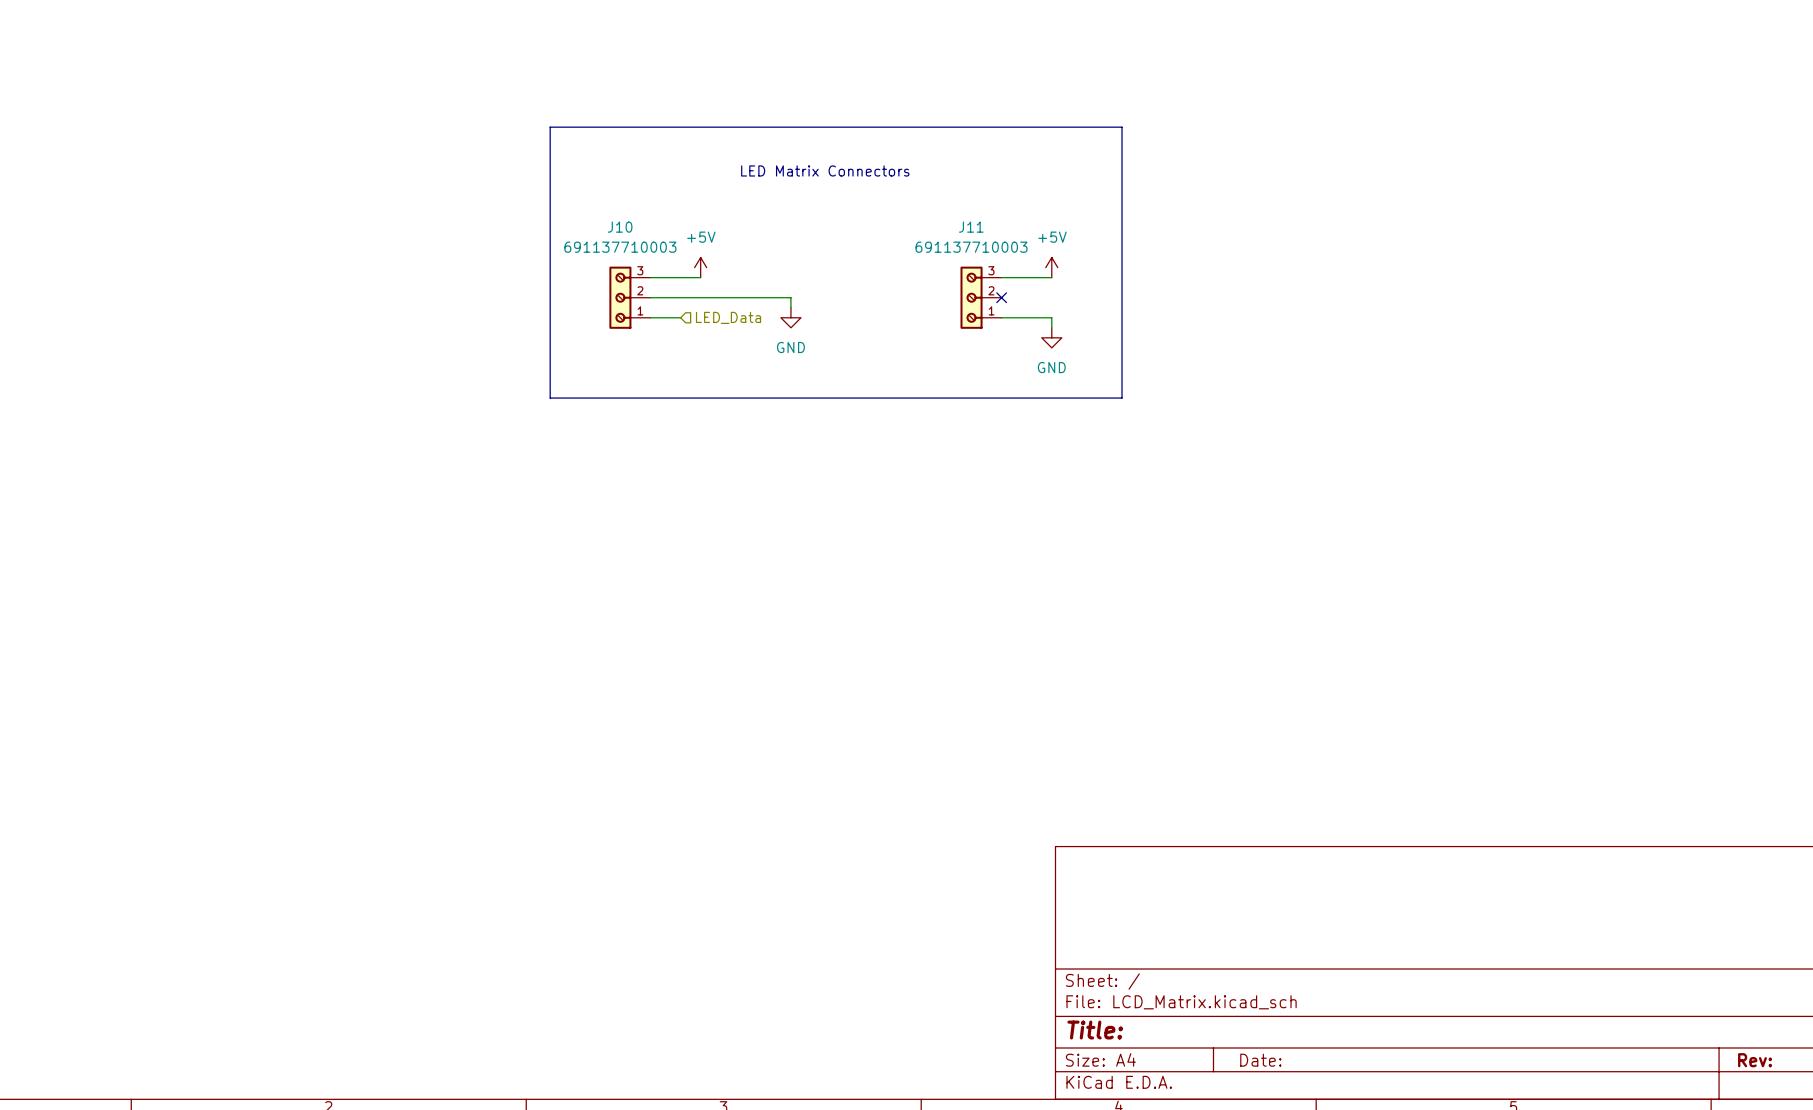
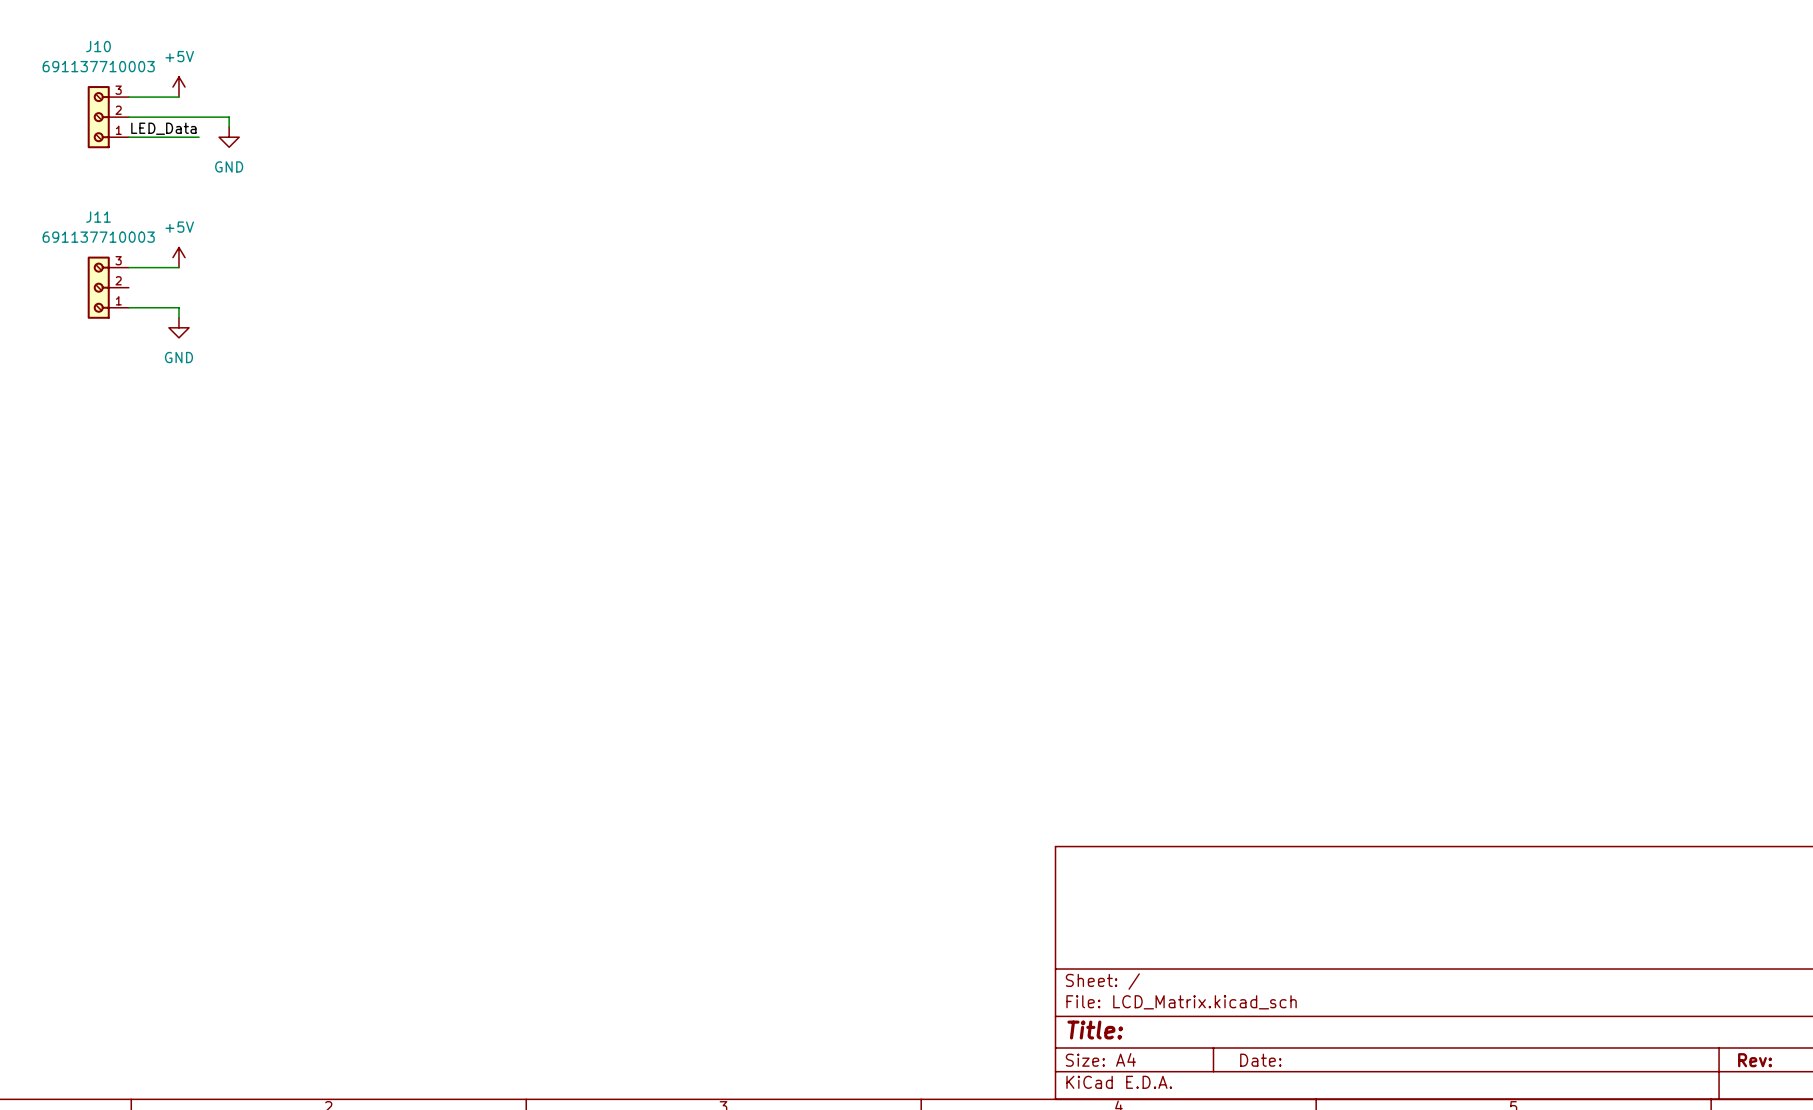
power symbol: none -> +5V (178, 87)
wire: none -> (128, 97) (178, 97)
wire: none -> (128, 117) (229, 117) (229, 127)
line: (550, 127) (1122, 127) (1122, 398) (550, 398) (550, 127) -> none
label: none -> LED_Data (163, 128)
wire: none -> (128, 137) (199, 137)
power symbol: none -> GND (229, 137)
text: LED Matrix Connectors (825, 170) -> none
power symbol: none -> +5V (178, 257)
wire: none -> (128, 267) (178, 267)
power symbol: +5V (700, 267) -> none
power symbol: +5V (1051, 267) -> none
wire: (650, 277) (700, 277) -> none
wire: (1001, 277) (1051, 277) -> none
J10 position: (629, 297) -> (108, 117)
wire: (650, 297) (790, 297) (790, 307) -> none
J11 position: (981, 297) -> (108, 287)
no-connect mark: (1001, 297) -> none
wire: none -> (128, 307) (178, 307) (178, 317)
wire: (650, 317) (680, 317) -> none
hierarchical label: LED_Data (728, 317) -> none
power symbol: GND (790, 317) -> none
wire: (1001, 317) (1051, 317) (1051, 327) -> none
power symbol: none -> GND (178, 327)
power symbol: GND (1051, 337) -> none

